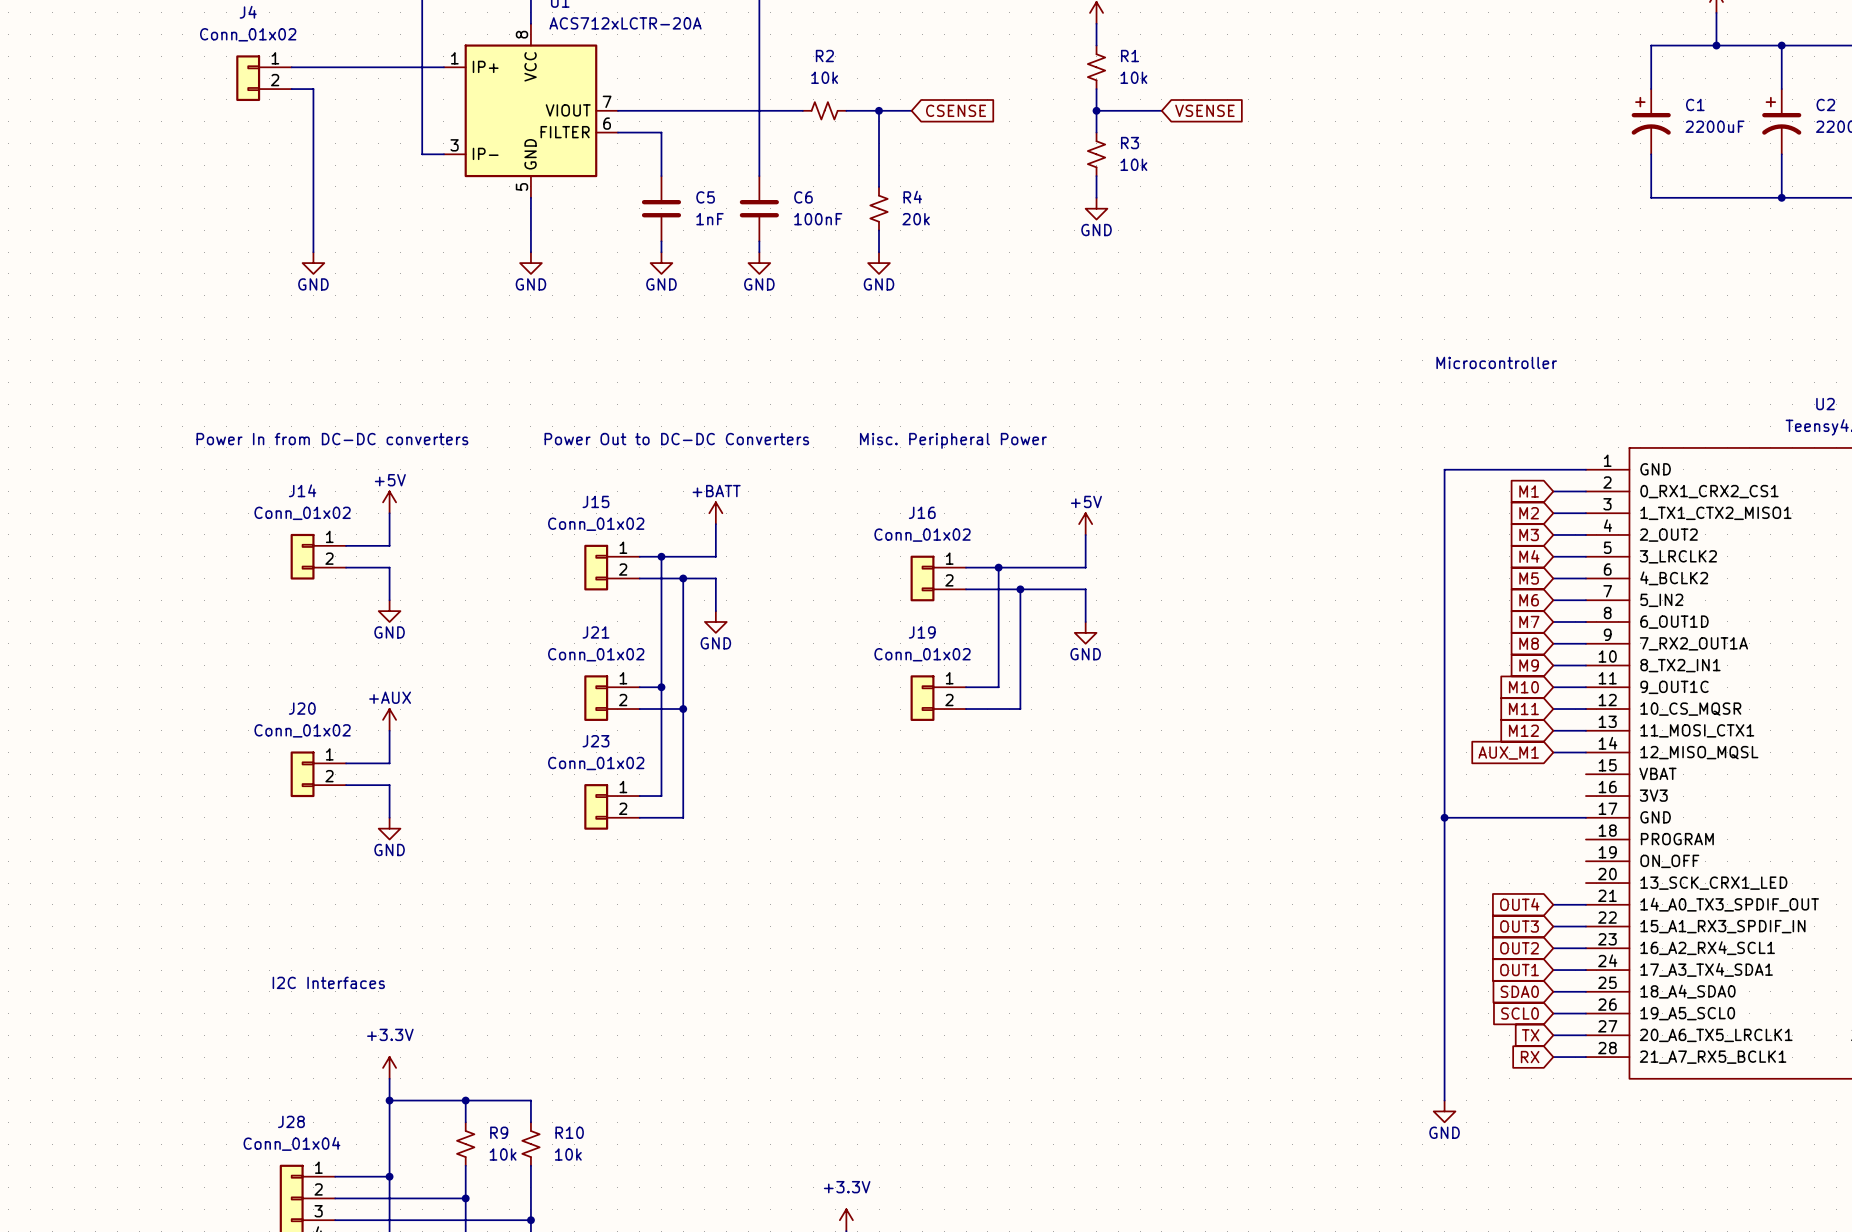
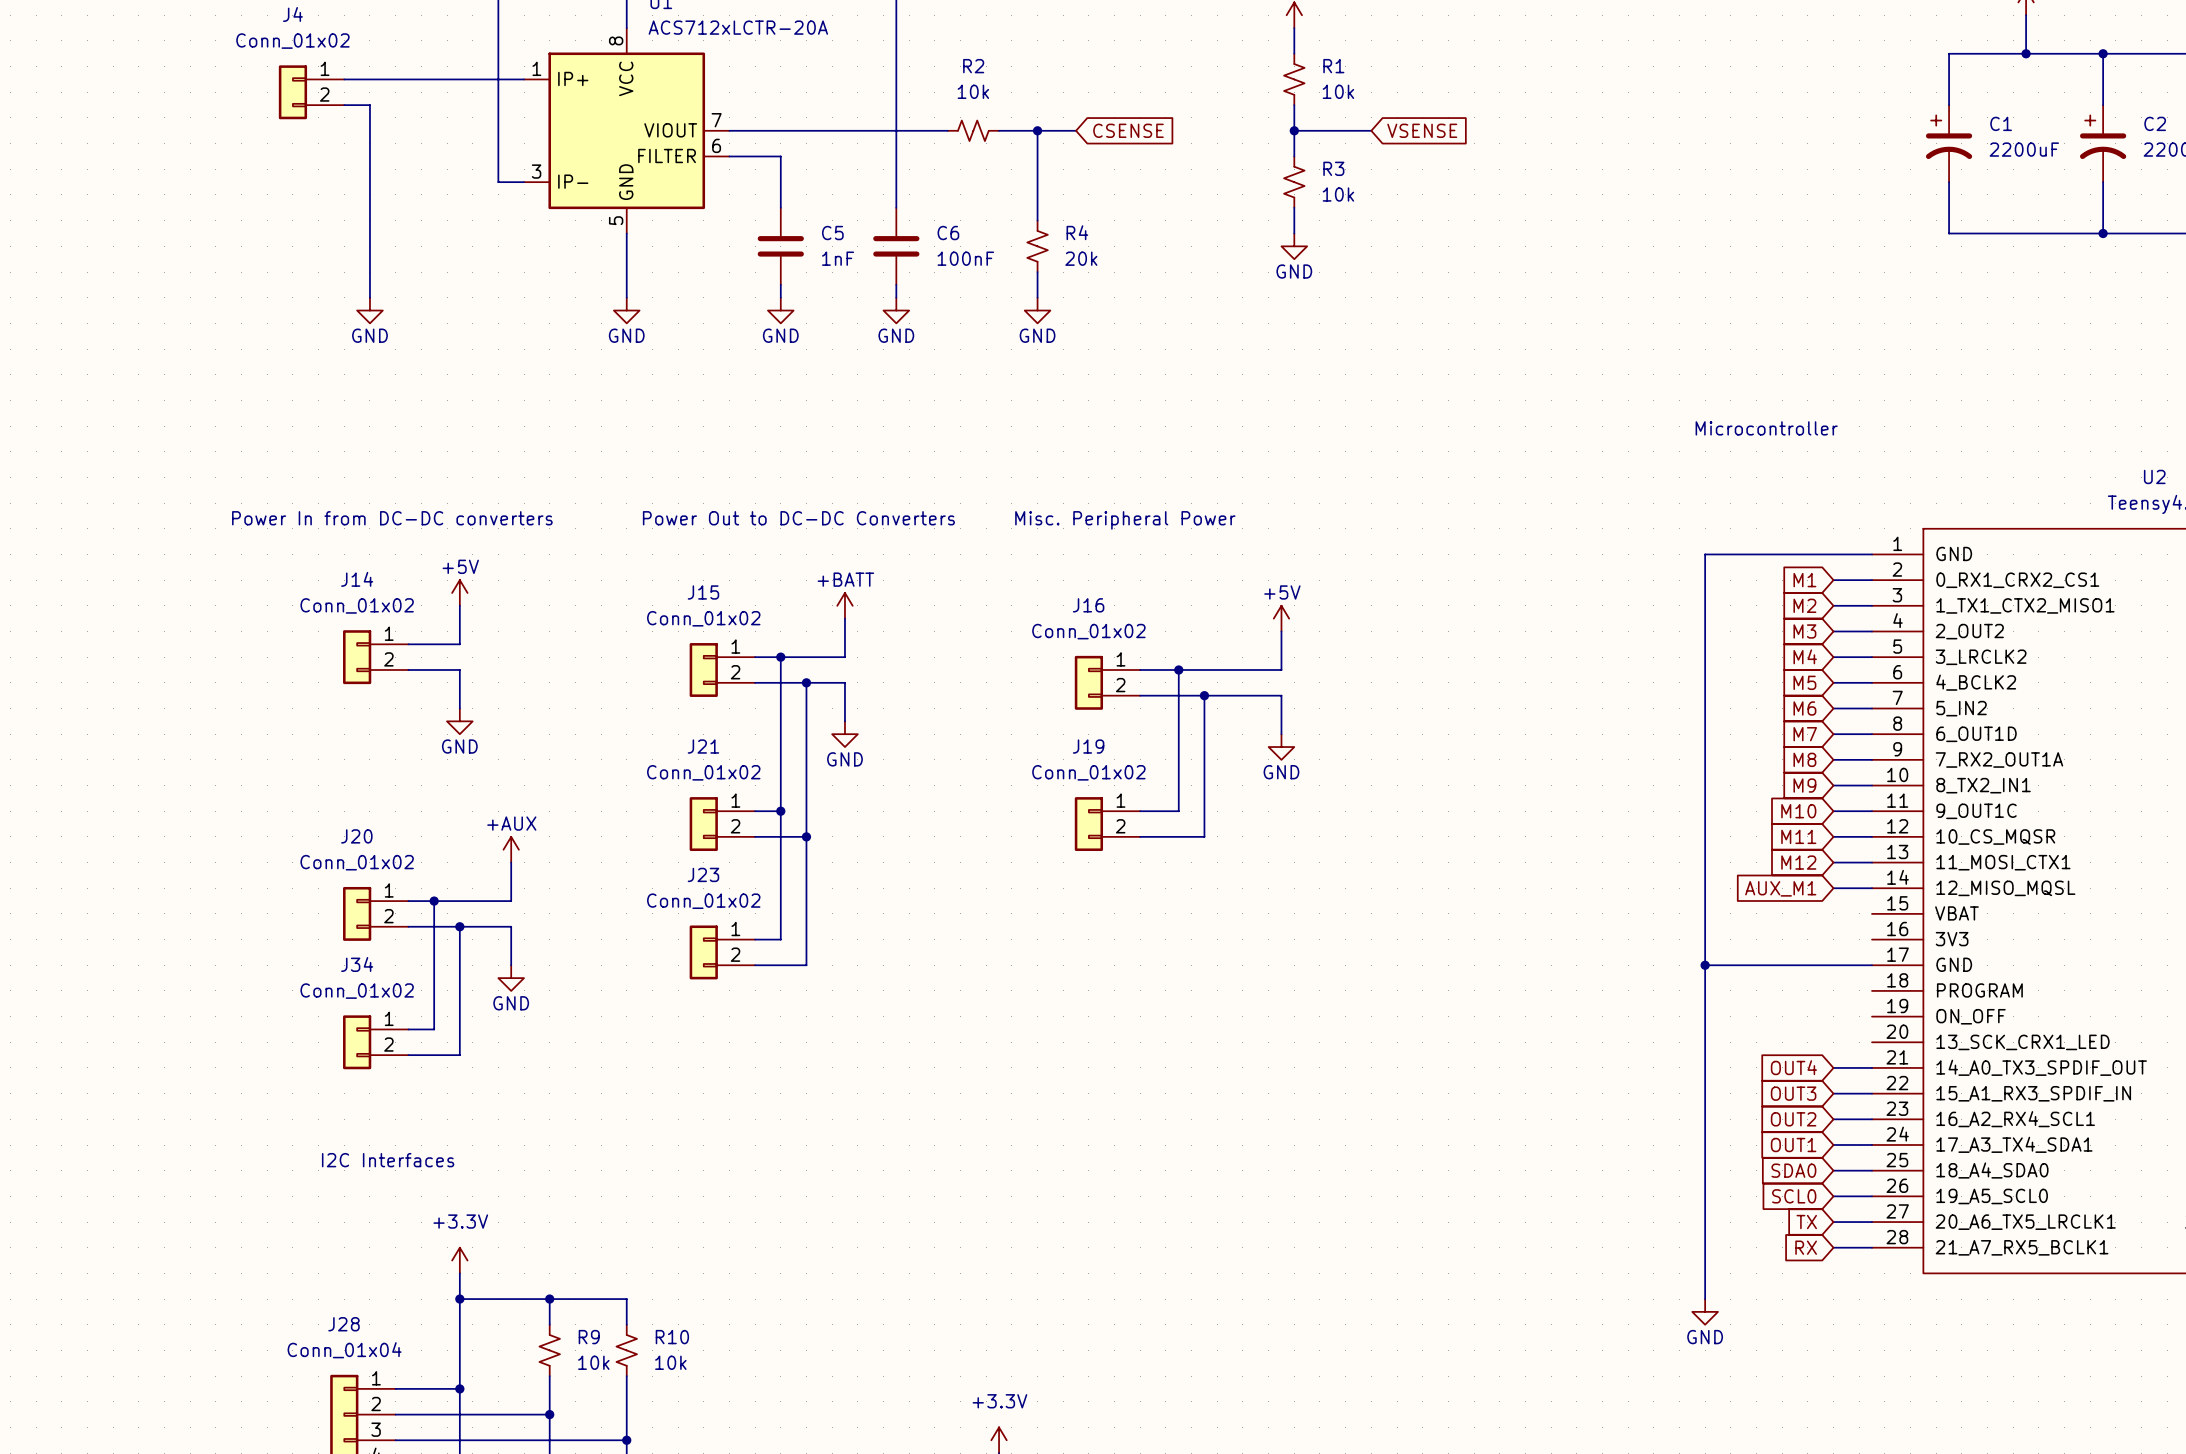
power symbol position: +AUX (389, 719) -> +AUX (511, 849)
wire: (389, 730) (389, 763) -> (511, 862) (511, 901) (459, 901)
wire: none -> (434, 901) (434, 1029) (408, 1029)
junction: none -> (434, 901)
wire: none -> (459, 926) (511, 926) (511, 965)
junction: none -> (459, 926)
wire: none -> (459, 965) (459, 1055) (408, 1055)
power symbol position: GND (389, 828) -> GND (511, 978)
J34: none -> Conn_01x02 (375, 1042)

